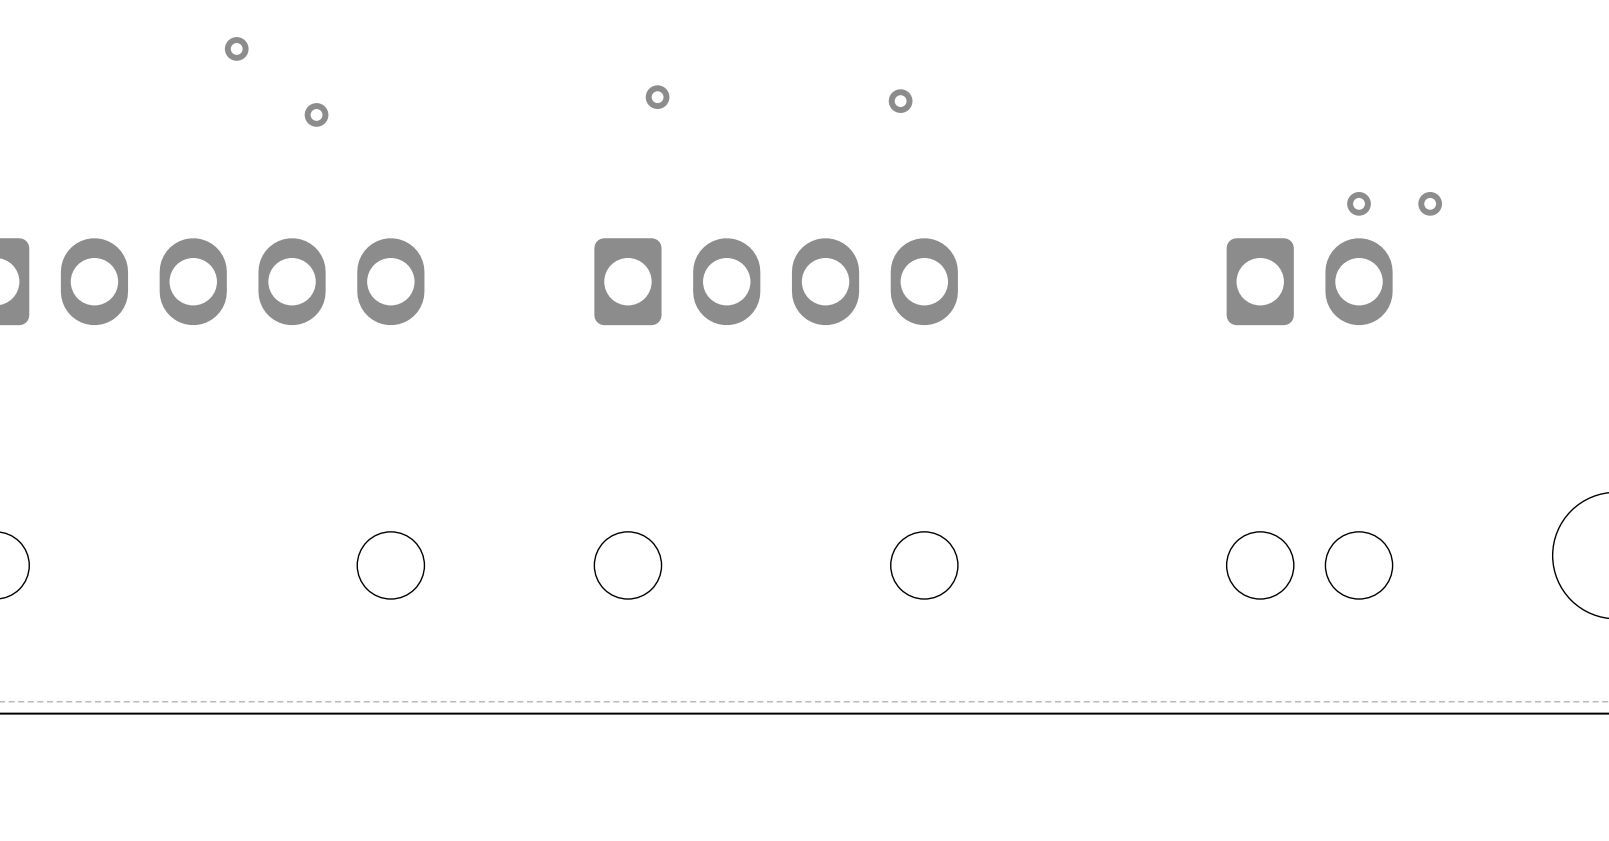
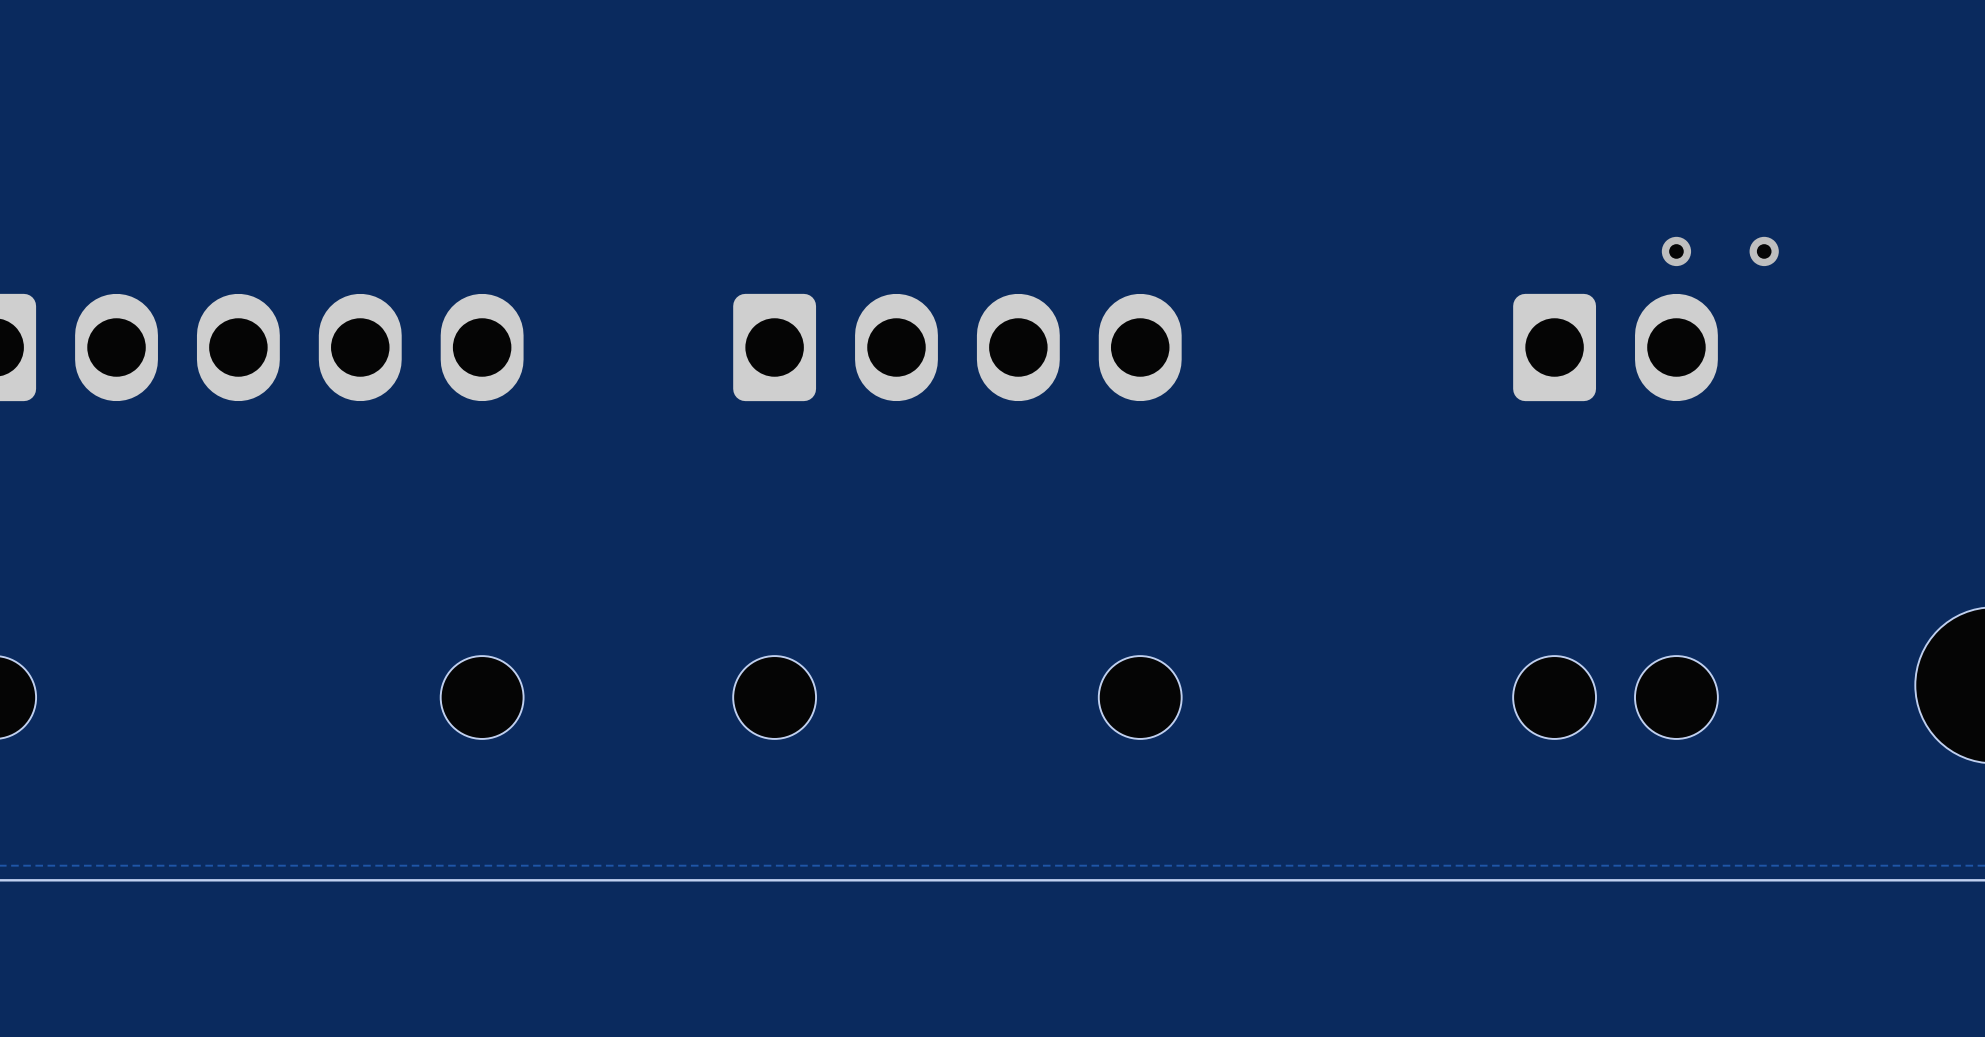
via: (236, 48) -> none
via: (657, 97) -> none
via: (900, 101) -> none
via: (316, 114) -> none

